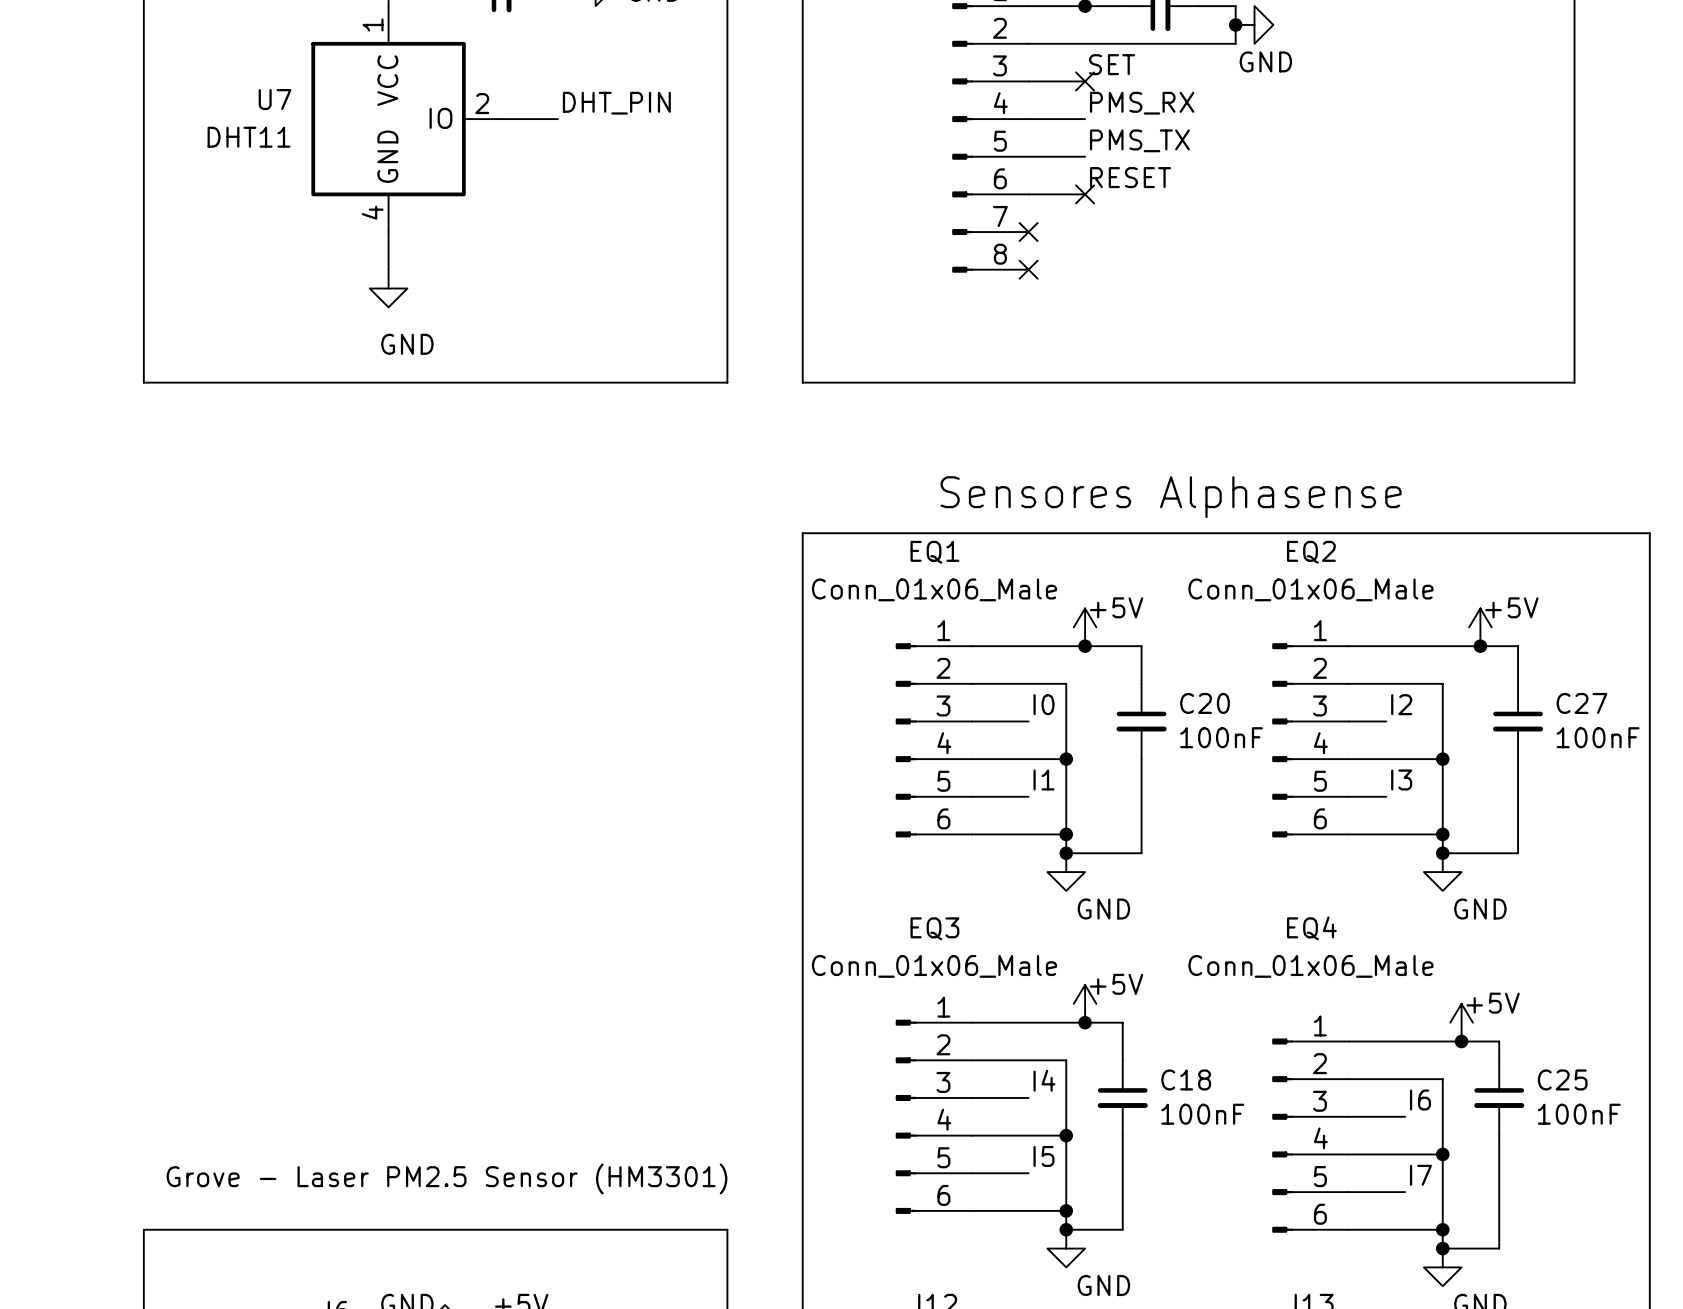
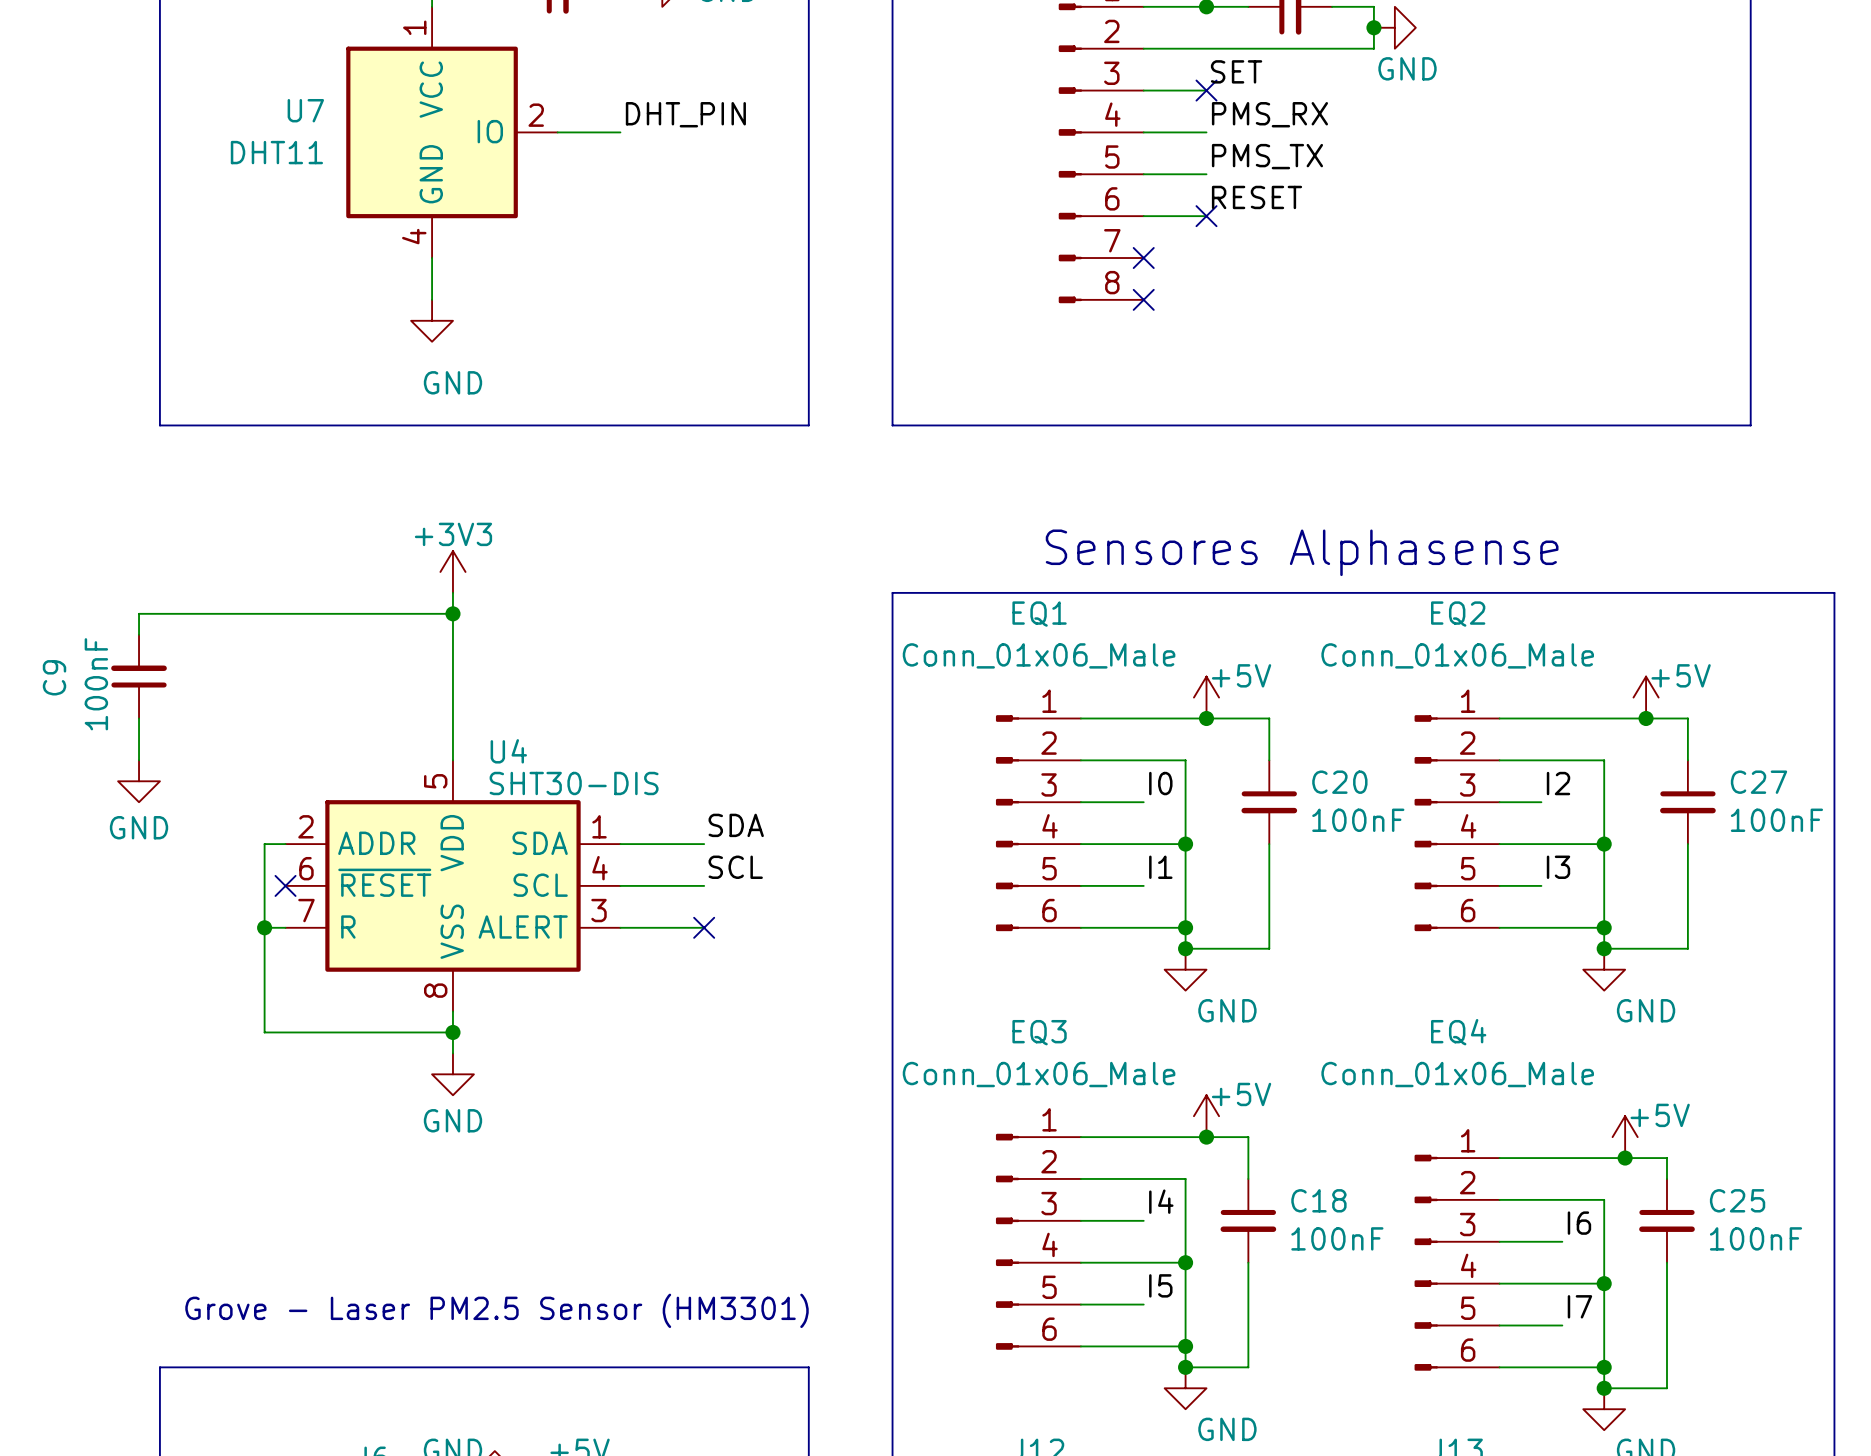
power symbol: none -> +3V3 (452, 571)
wire: none -> (452, 592) (452, 760)
wire: none -> (452, 613) (139, 613) (139, 634)
junction: none -> (452, 613)
C9: none -> 100nF (139, 676)
wire: none -> (139, 718) (139, 760)
power symbol: none -> GND (139, 781)
label: none -> SDA (736, 825)
wire: none -> (285, 844) (264, 844) (264, 1032) (452, 1032)
wire: none -> (620, 844) (704, 844)
label: none -> SCL (735, 867)
no-connect mark: none -> (285, 885)
U4: none -> SHT30-DIS (452, 885)
wire: none -> (620, 885) (704, 885)
wire: none -> (264, 927) (285, 927)
junction: none -> (264, 927)
wire: none -> (620, 927) (704, 927)
no-connect mark: none -> (704, 927)
wire: none -> (452, 1011) (452, 1053)
junction: none -> (452, 1032)
power symbol: none -> GND (452, 1074)

